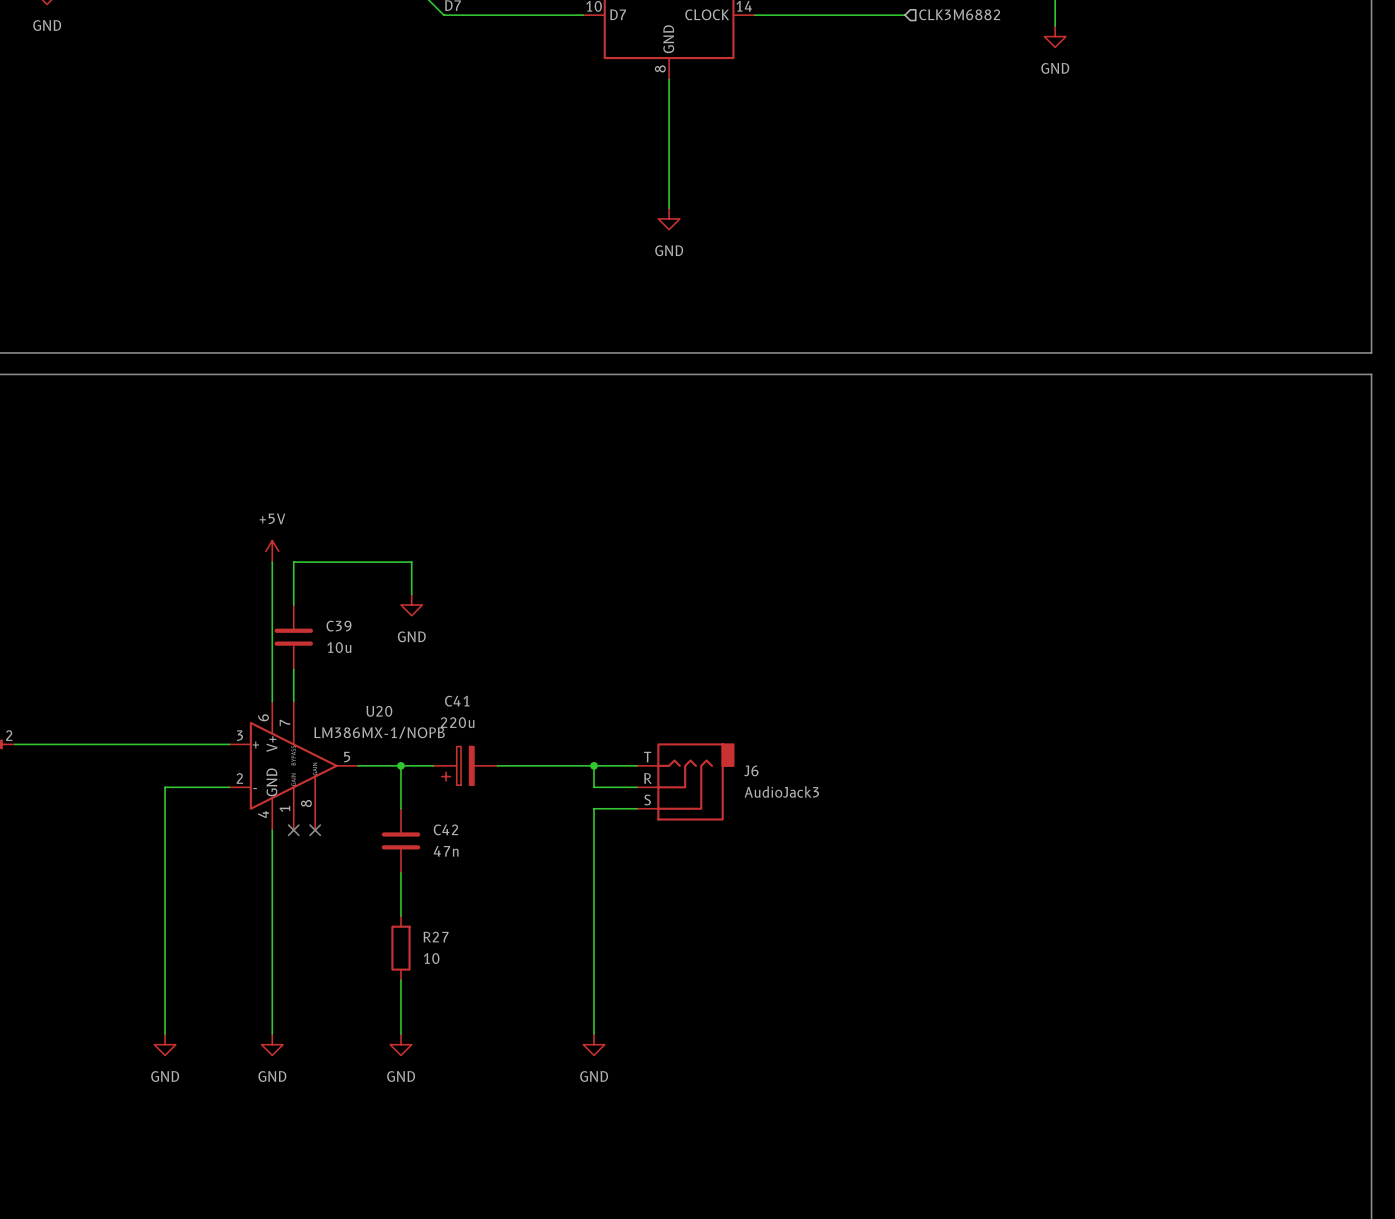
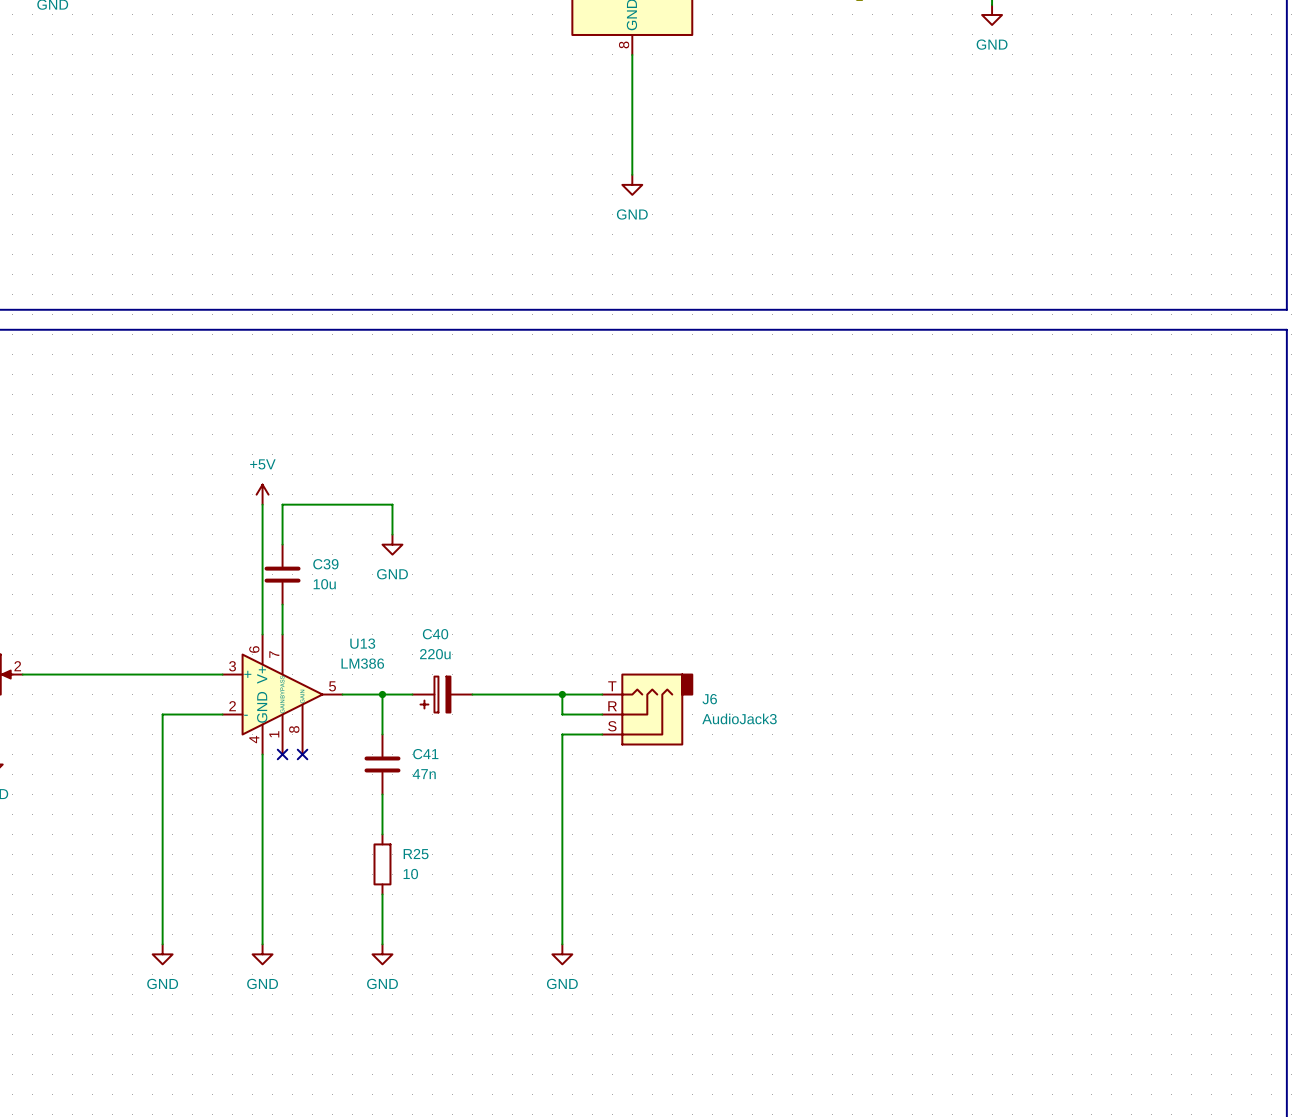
C41 name: C41 (457, 701) -> C40 (435, 634)
U20 name: U20 (379, 711) -> U13 (362, 643)
U20 value: LM386MX-1/NOPB (379, 732) -> LM386 (362, 663)
C42 name: C42 (446, 829) -> C41 (425, 754)
R27 name: R27 (436, 937) -> R25 (416, 854)

